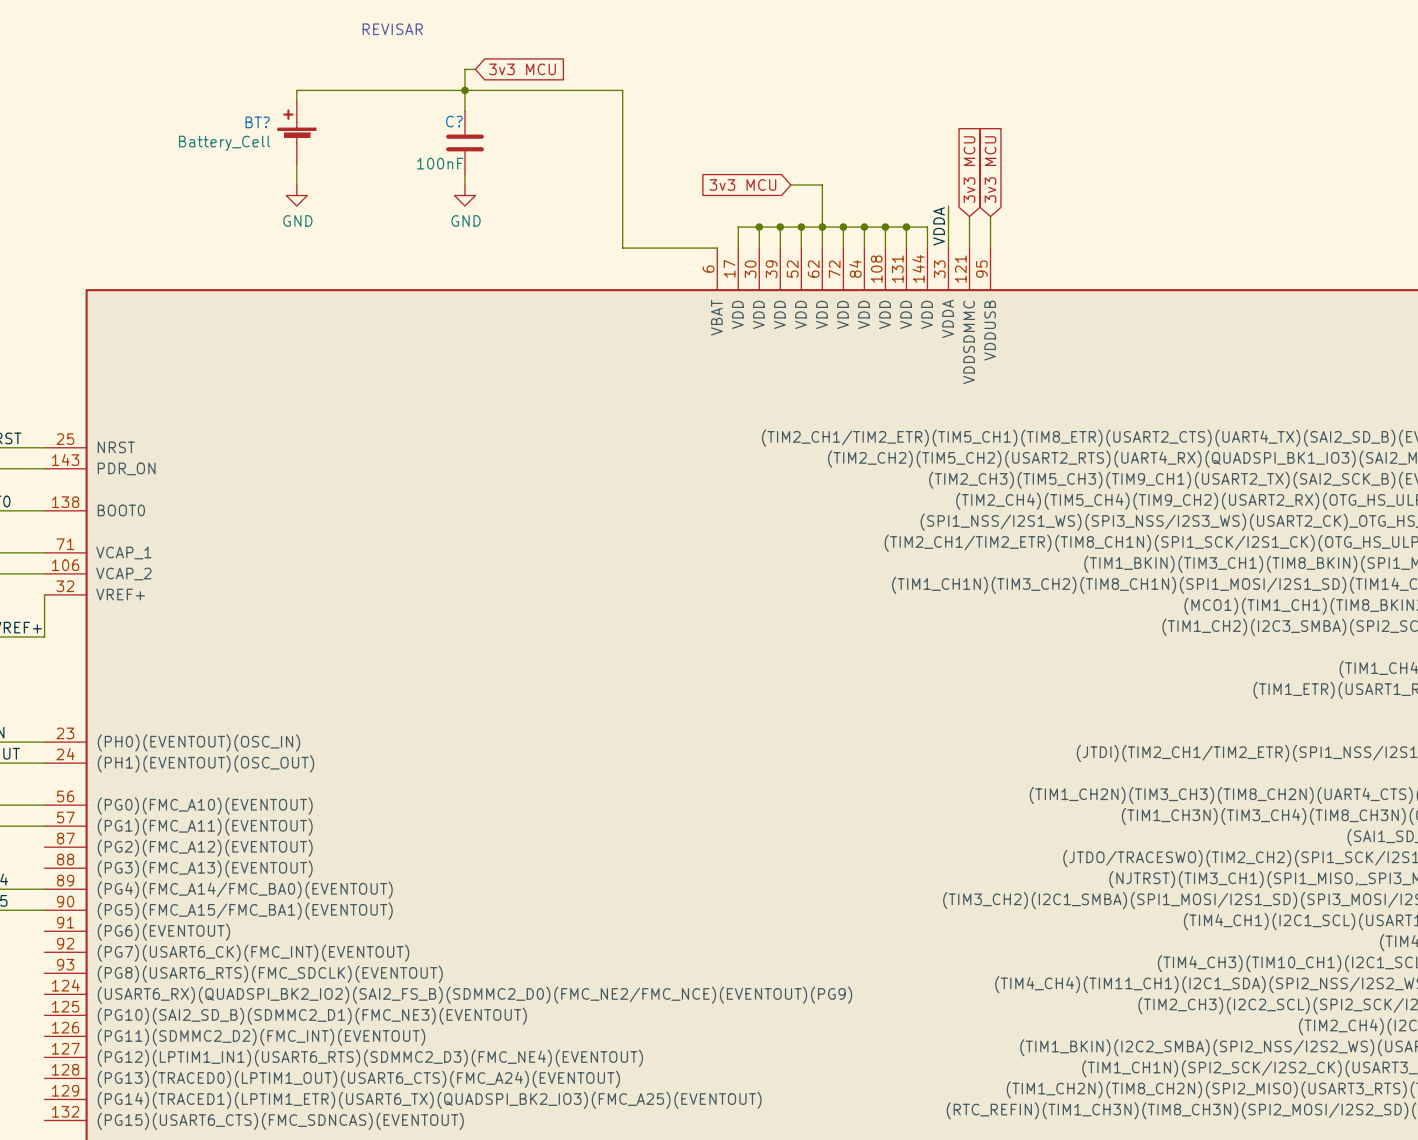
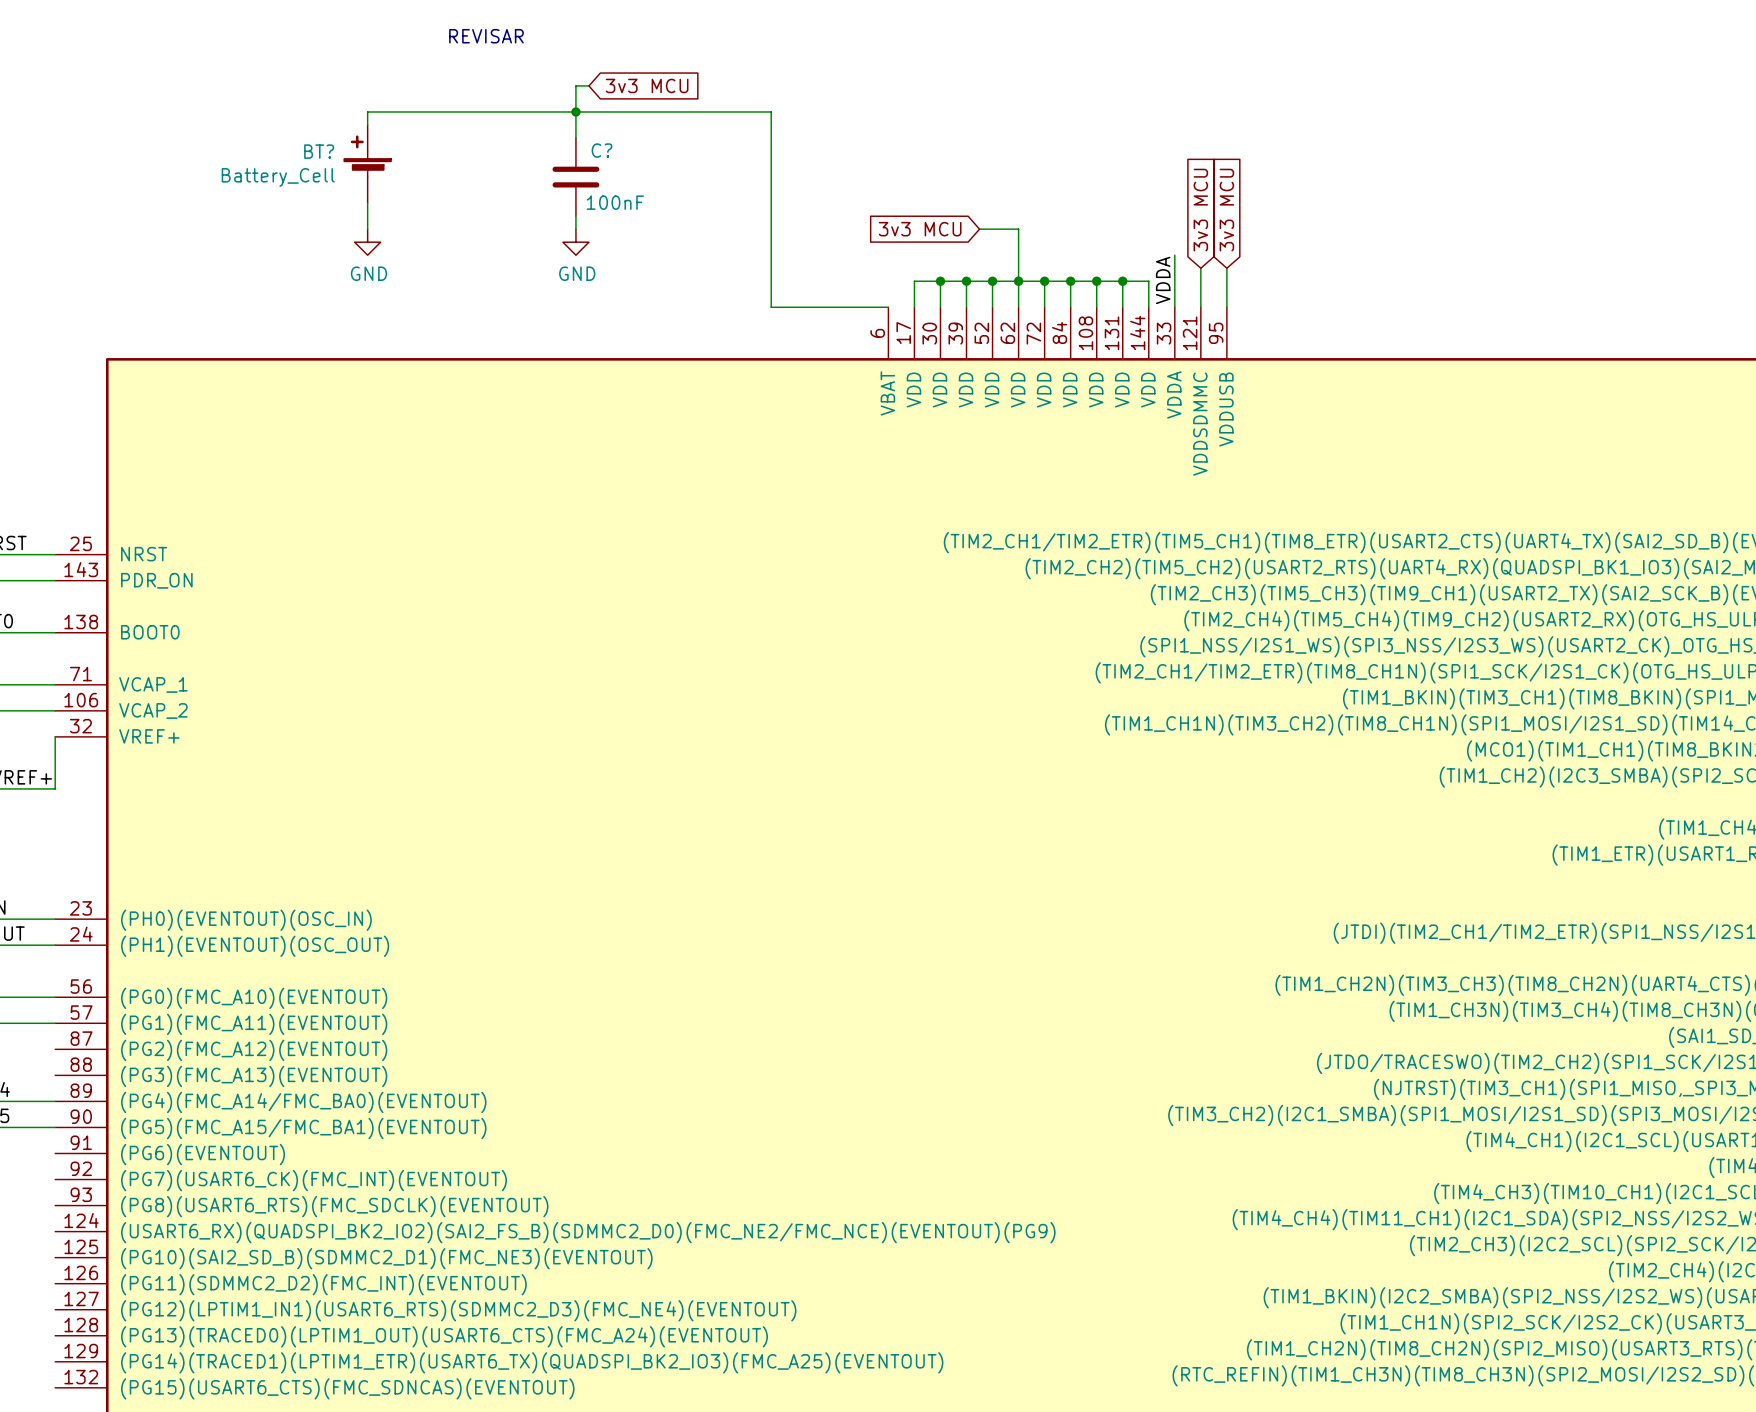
C? name position: C? (454, 121) -> C? (601, 150)
C? value position: 100nF (440, 163) -> 100nF (615, 202)

